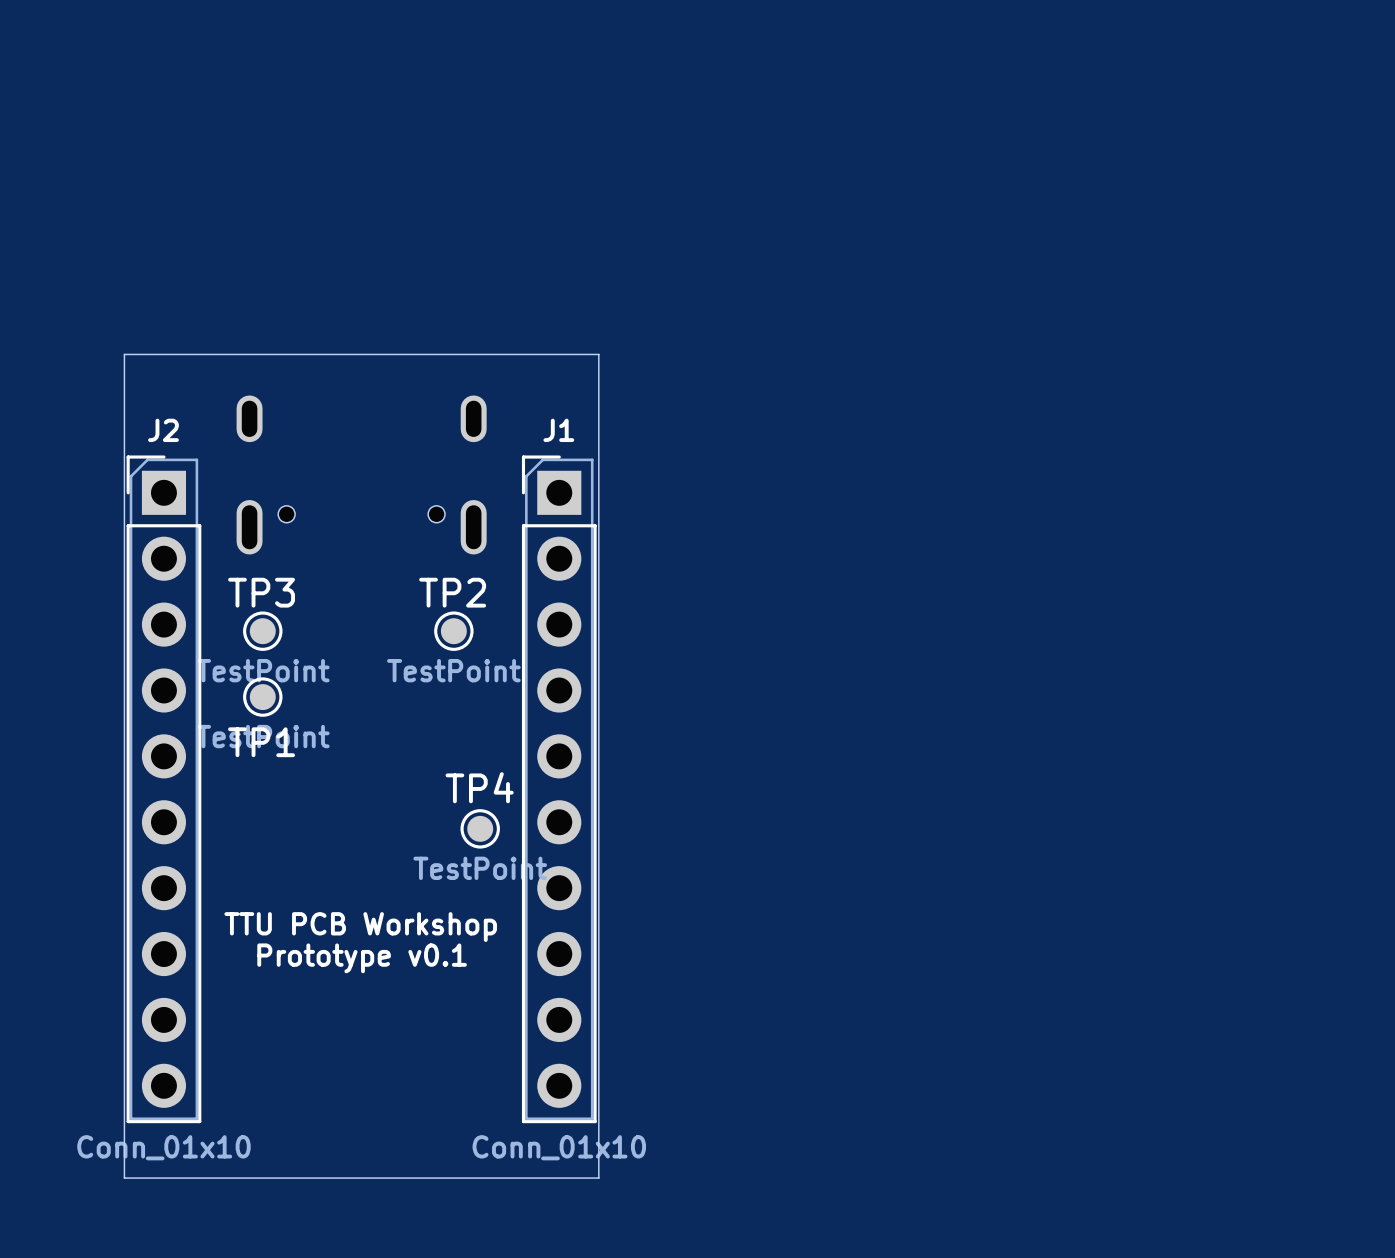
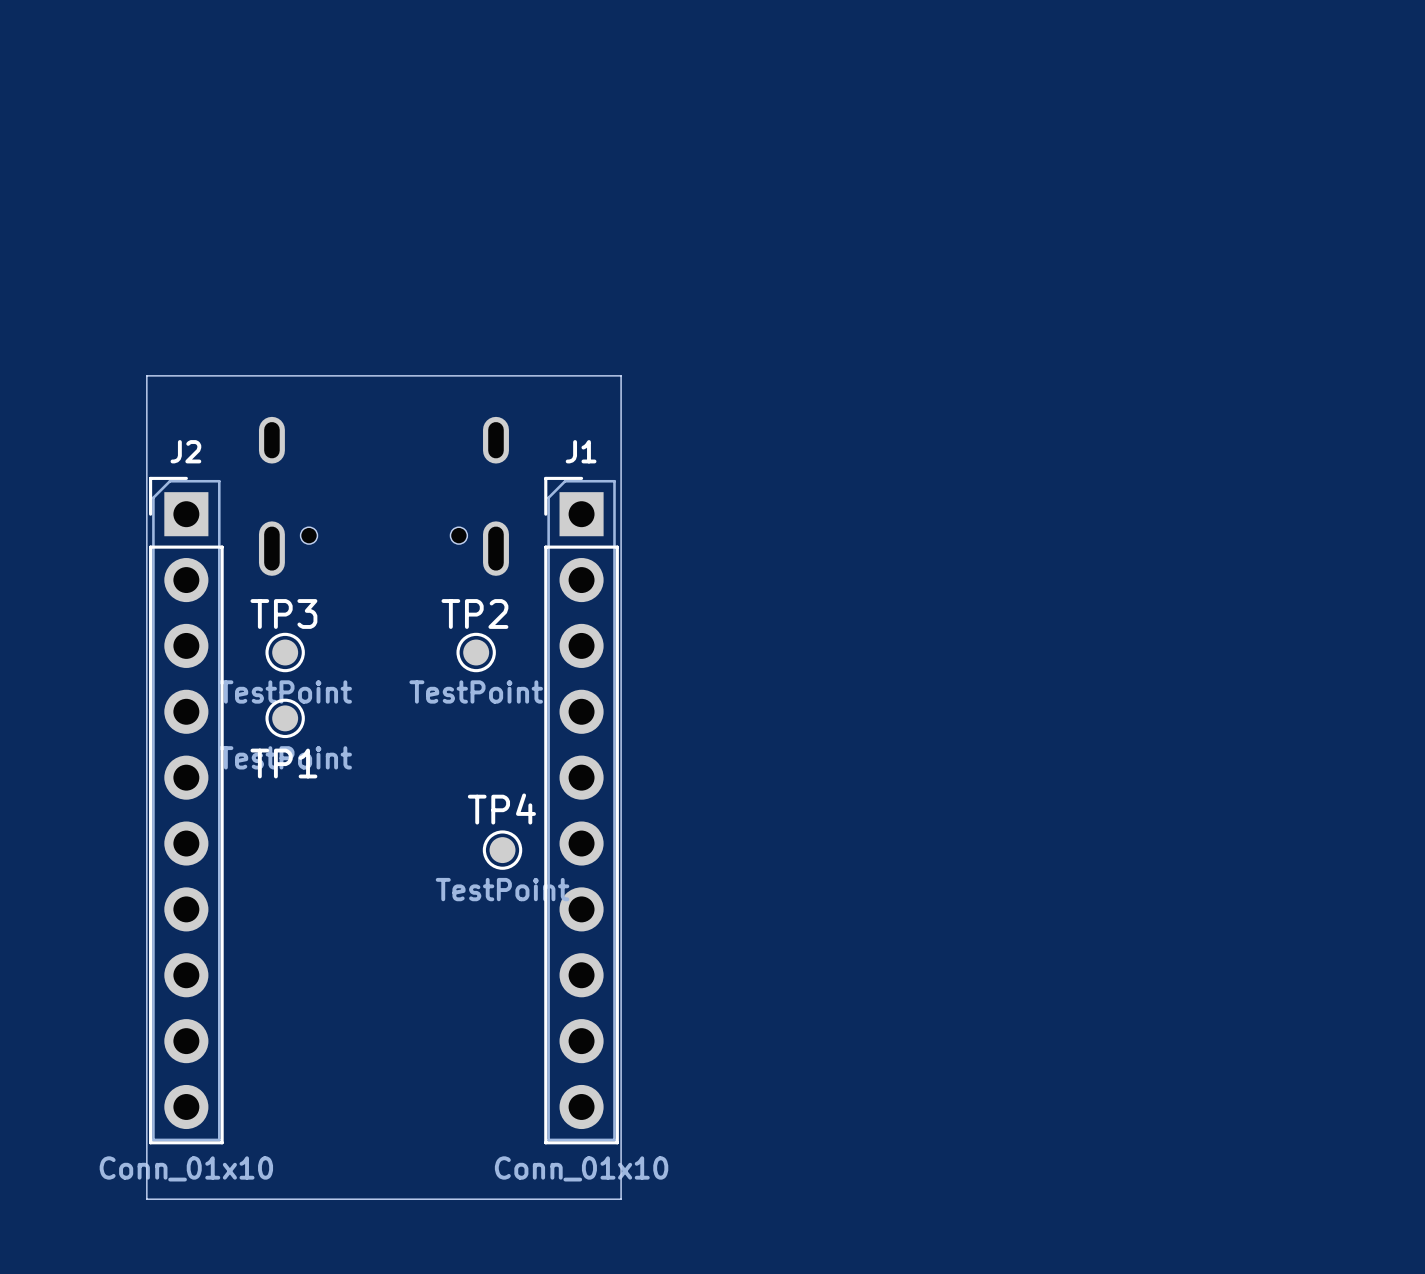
text: TTU PCB Workshop (360, 927) -> none
text: Prototype v0.1 (362, 958) -> none

